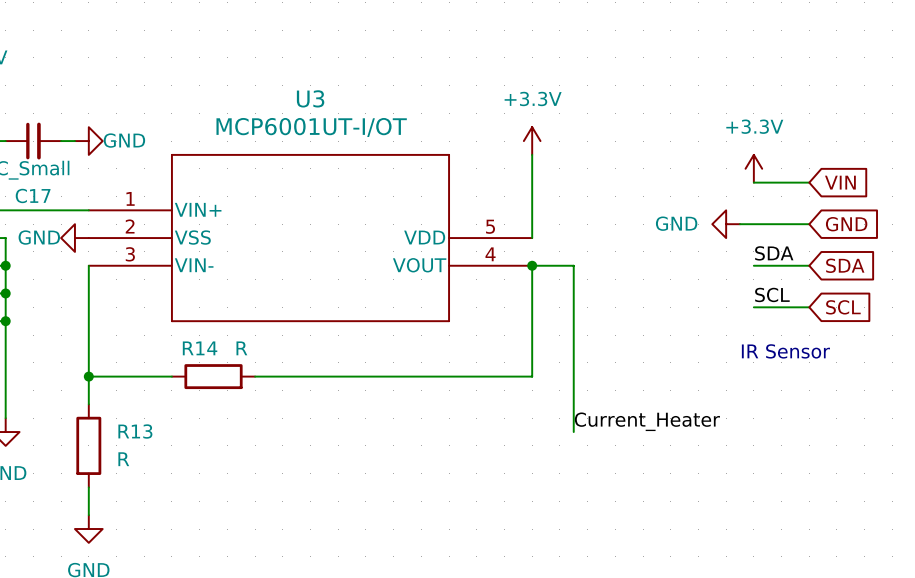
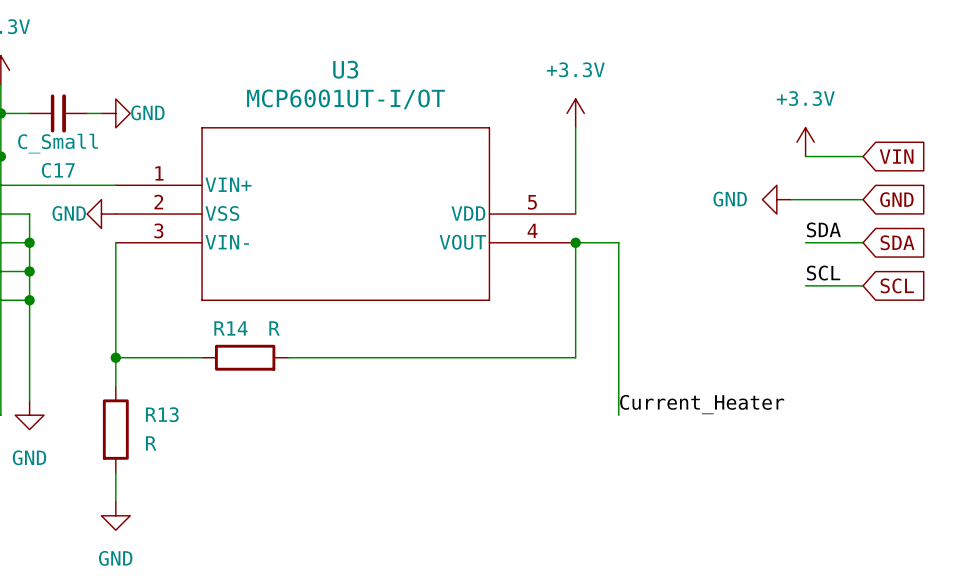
text: IR Sensor (785, 351) -> none

